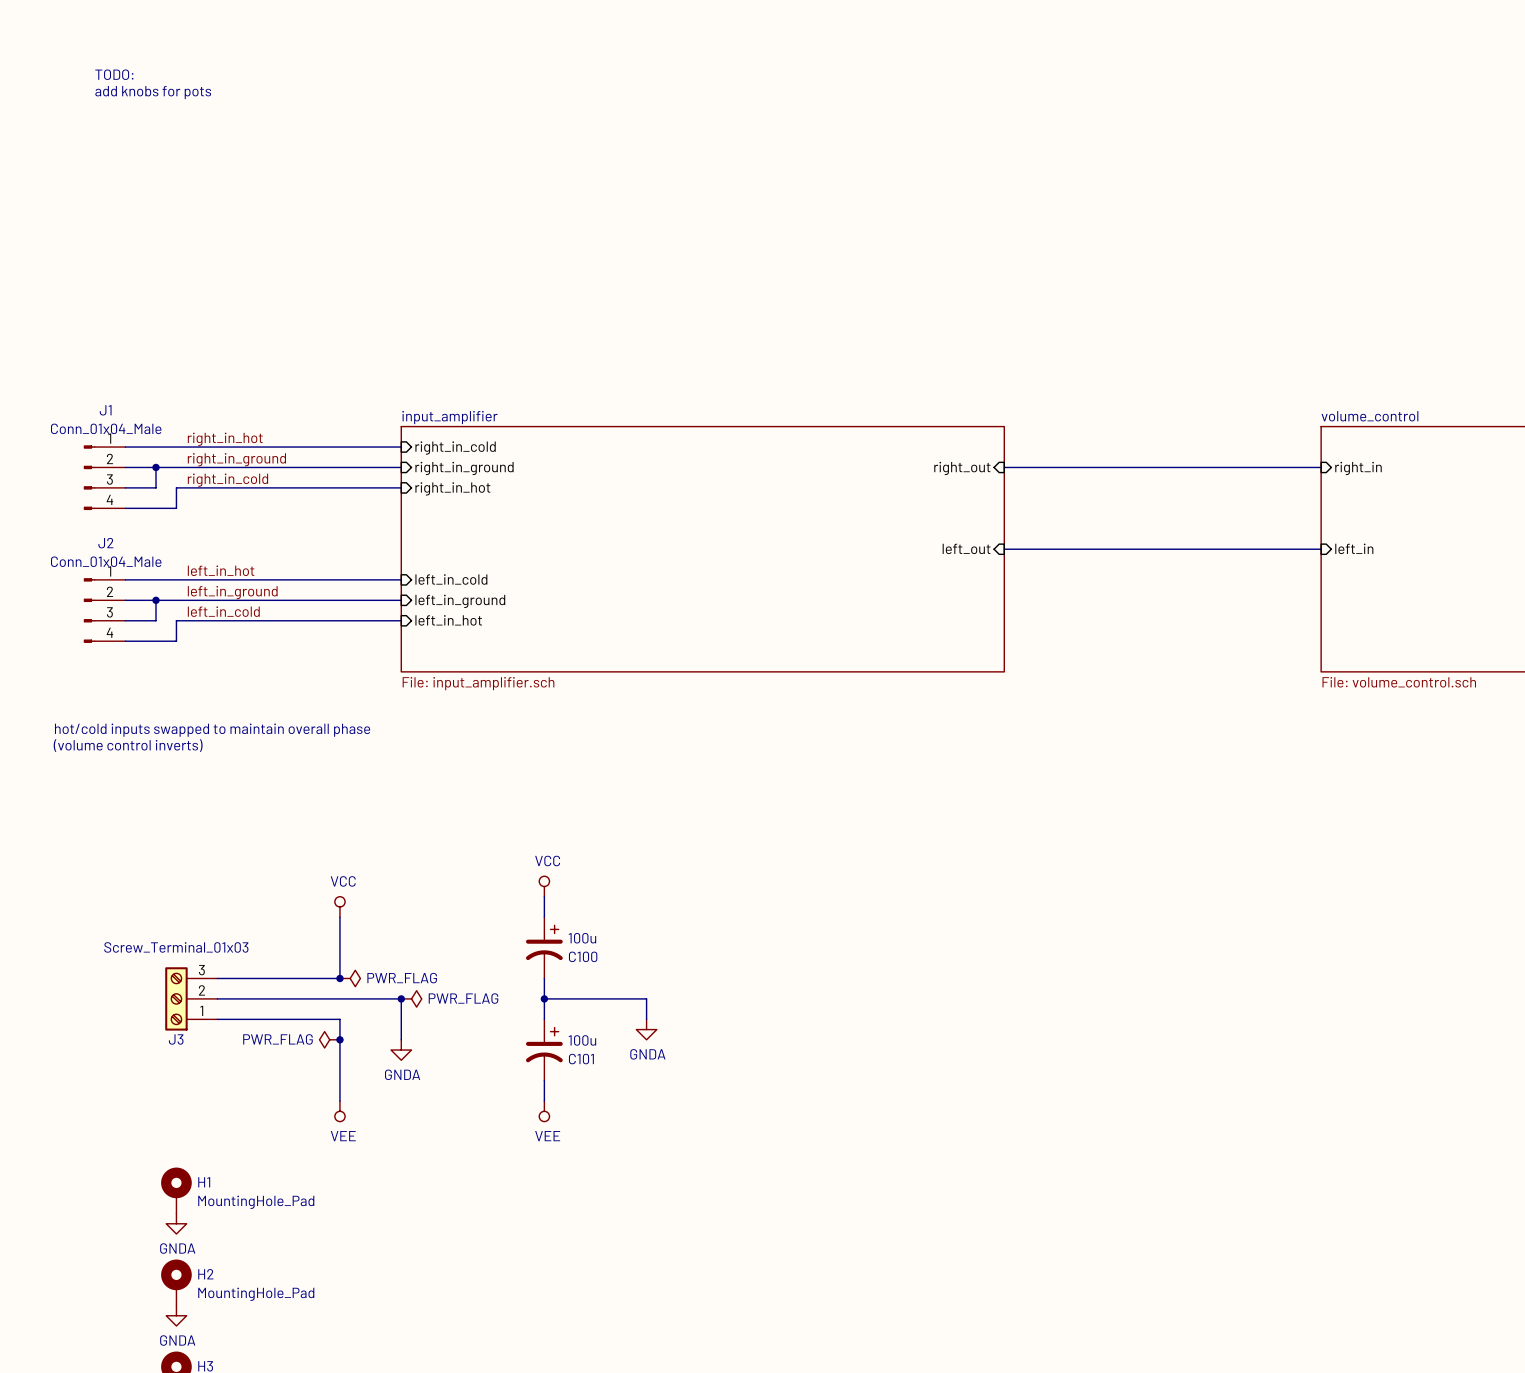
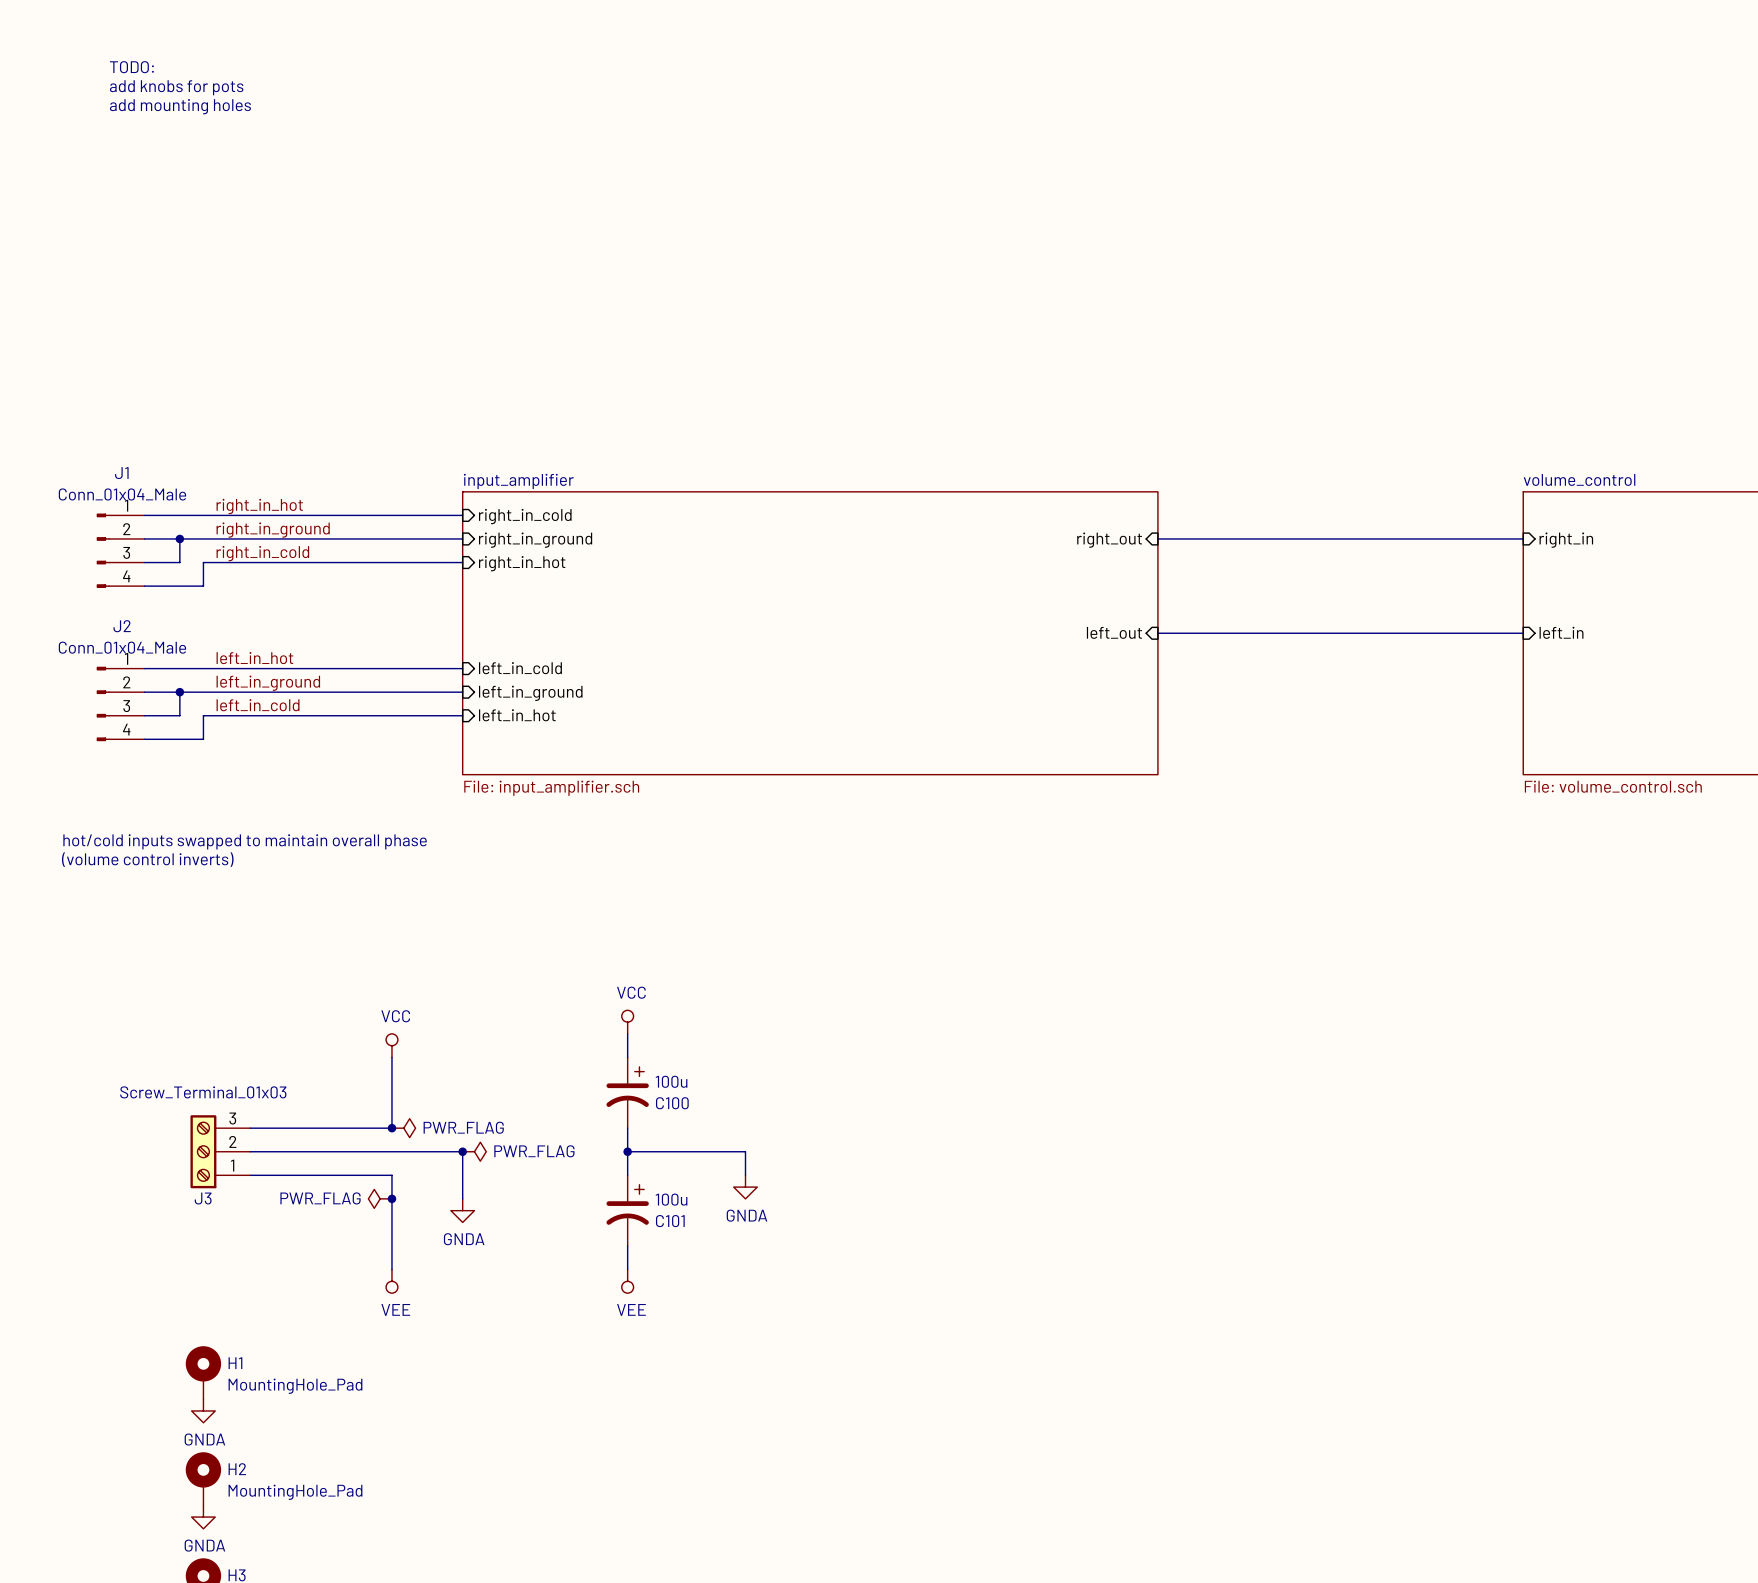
text: none -> TODO: (131, 67)
text: TODO: (114, 74) -> add knobs for pots (176, 87)
text: add knobs for pots (153, 92) -> add mounting holes (180, 106)

